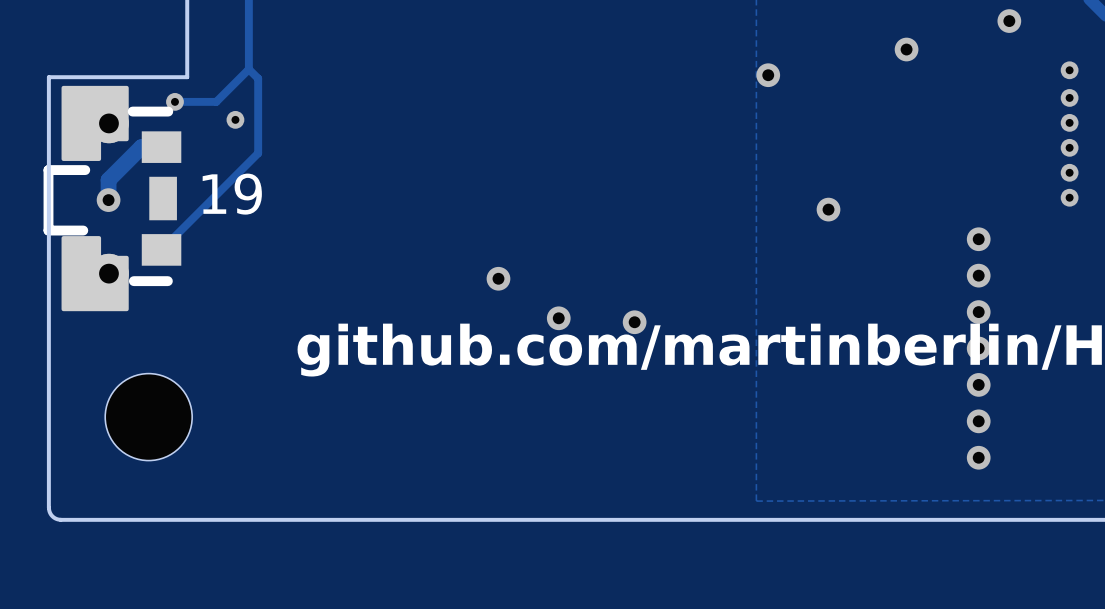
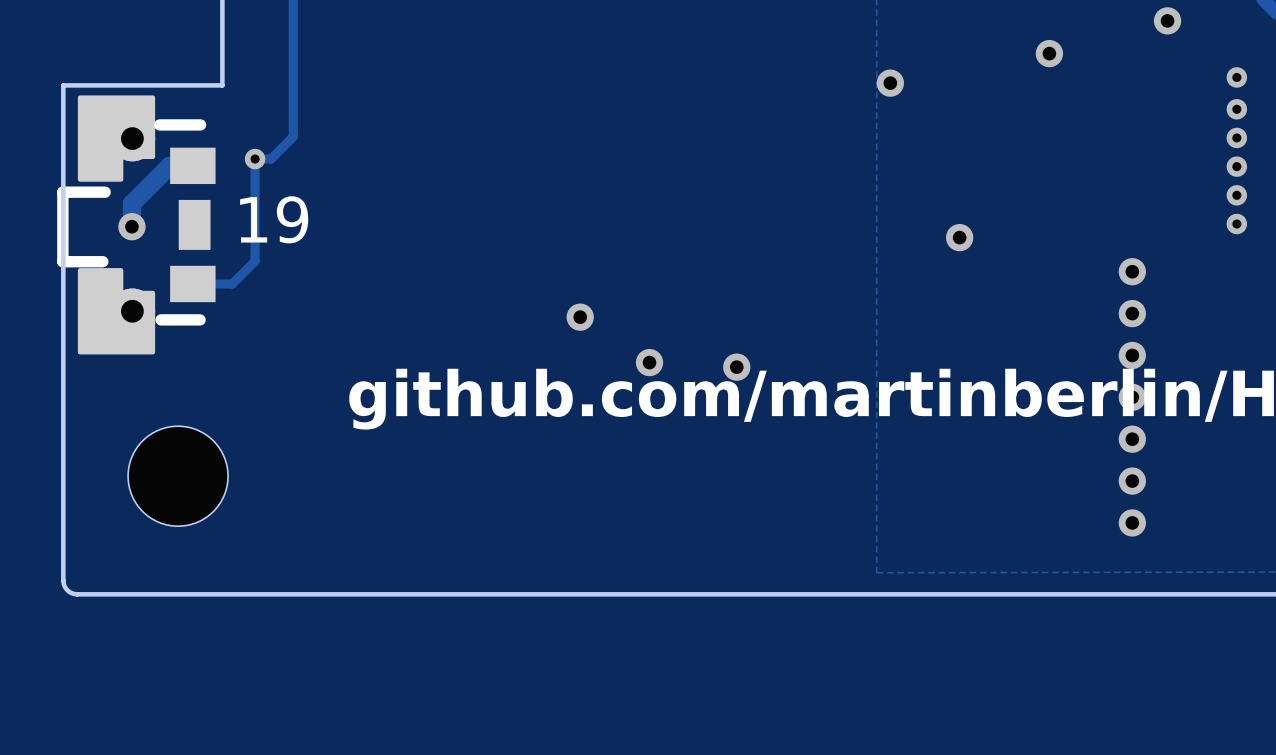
track: (174, 101) (216, 101) (248, 69) (258, 78) (258, 153) (161, 249) -> (293, 76) (293, 136) (270, 159) (255, 159) (255, 261) (232, 283) (192, 283)
via: (174, 101) -> none
via: (235, 119) -> none
via: none -> (255, 159)

